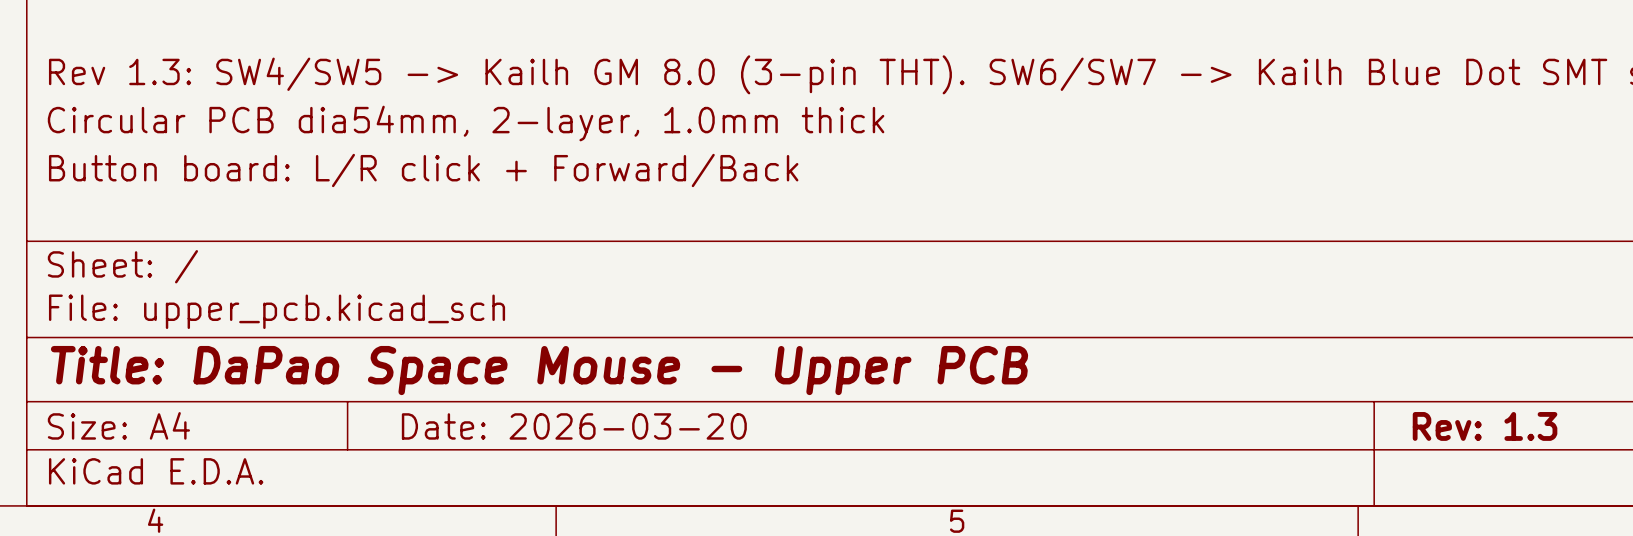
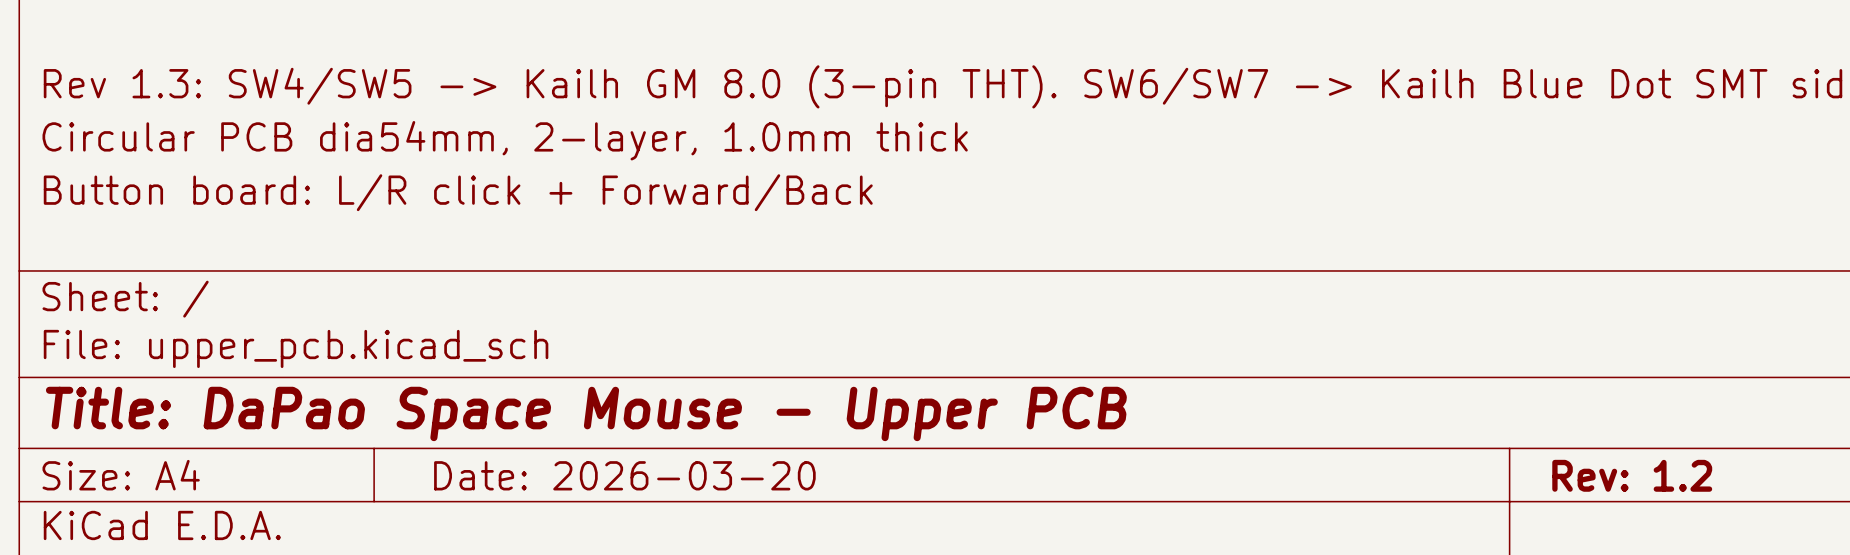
title block: Rev: 1.3 (1485, 426) -> Rev: 1.2 (1632, 475)

